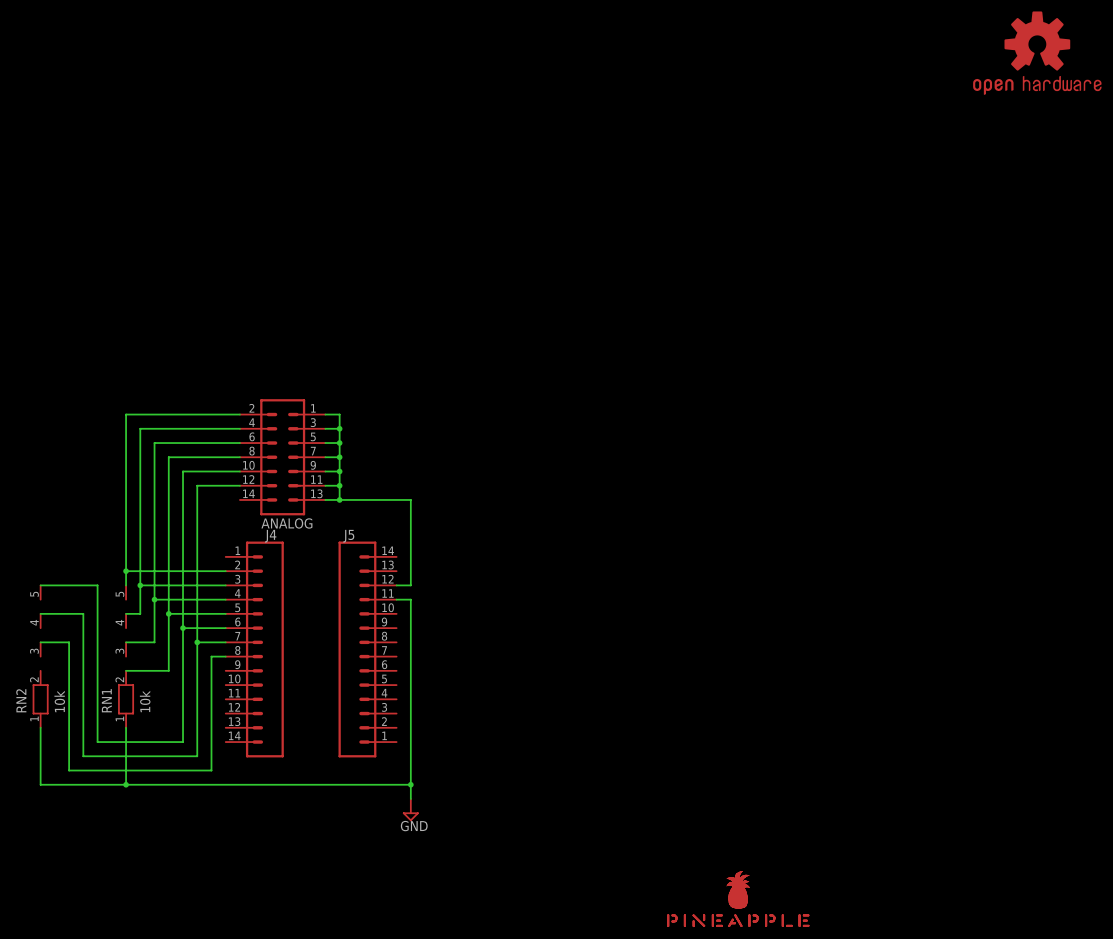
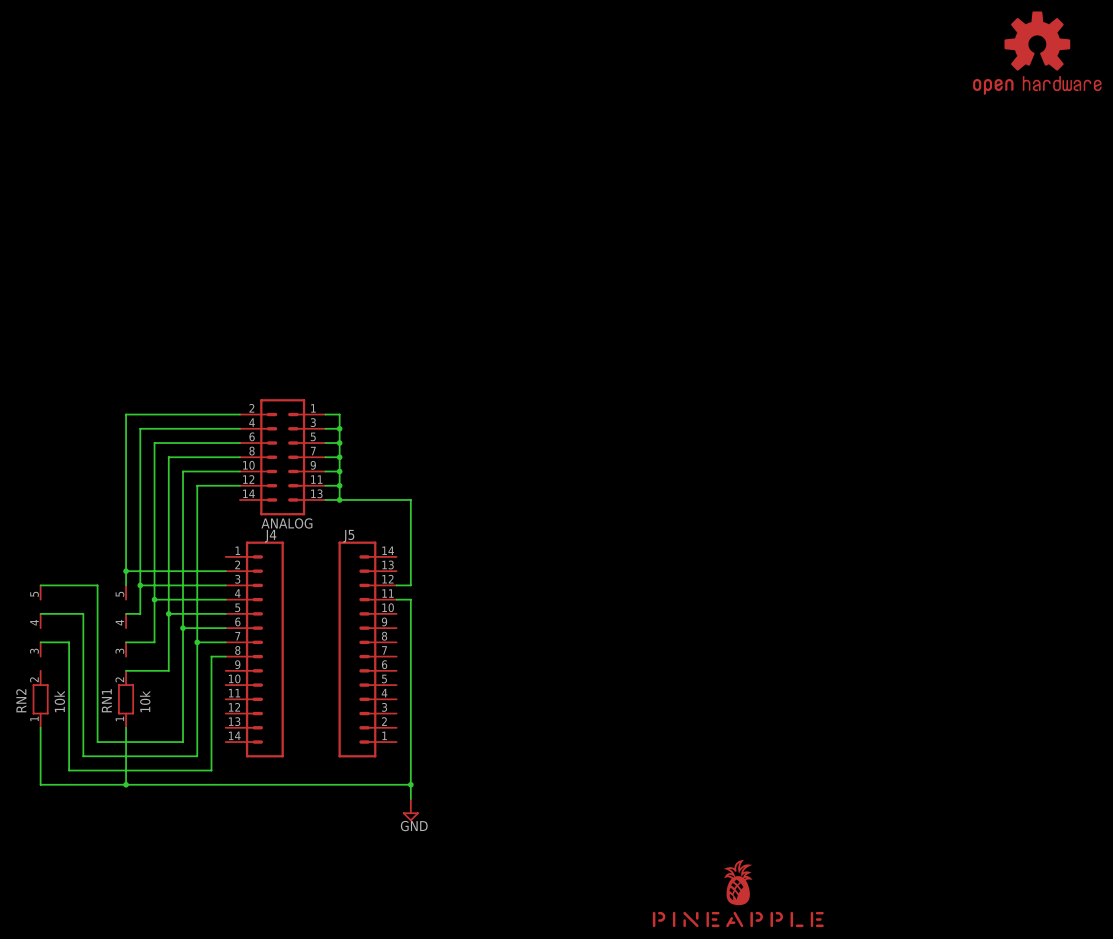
part: none -> (738, 893)
part: (738, 899) -> none

